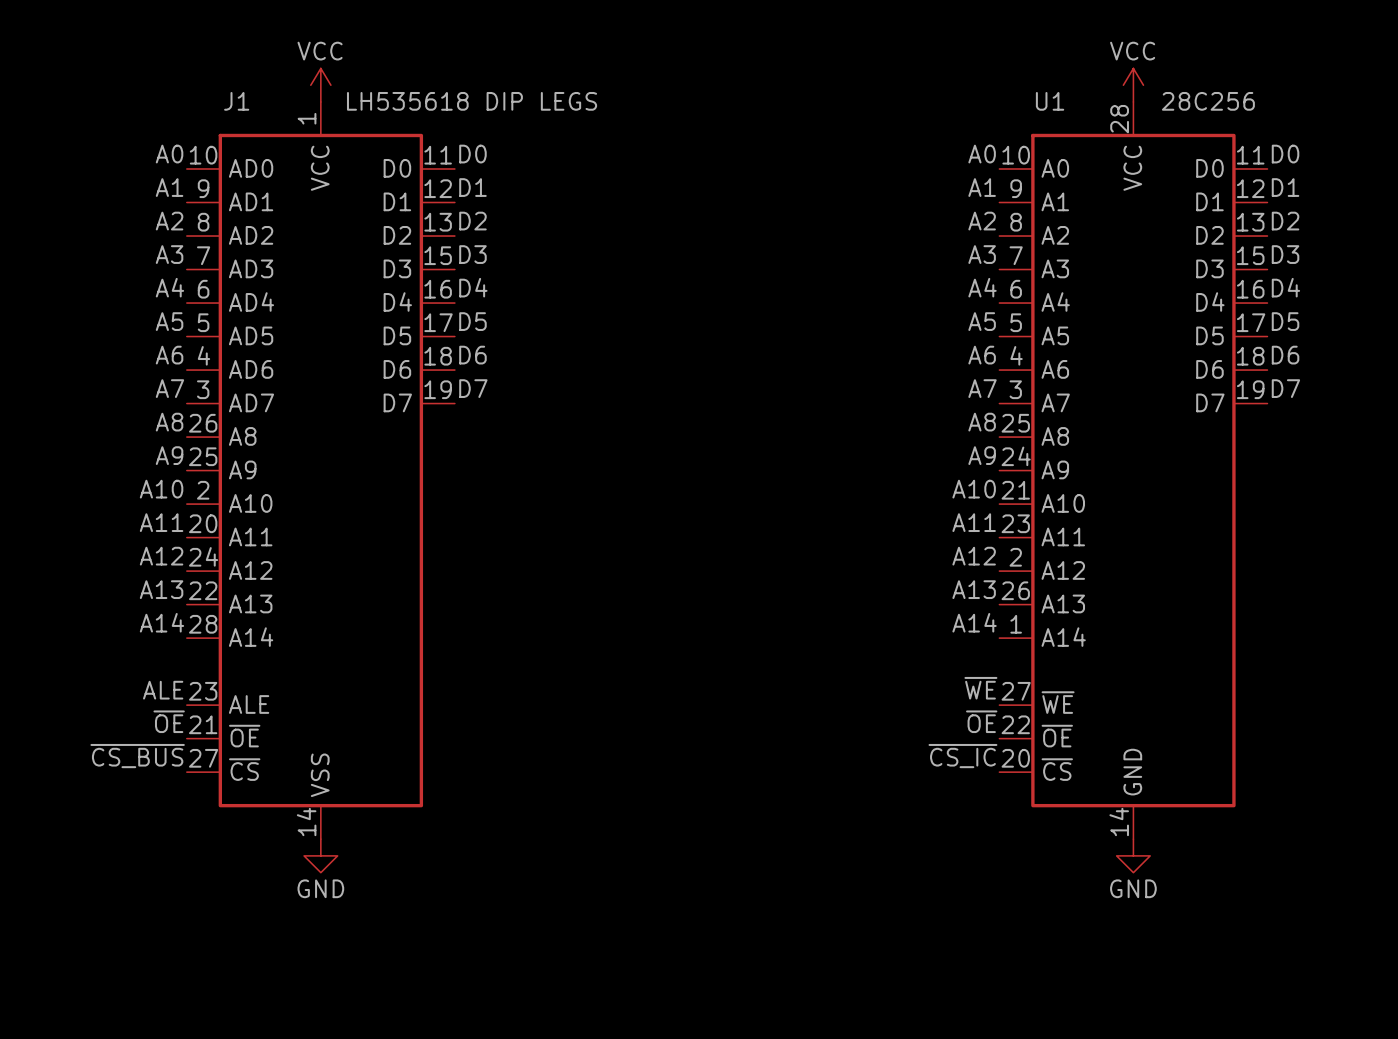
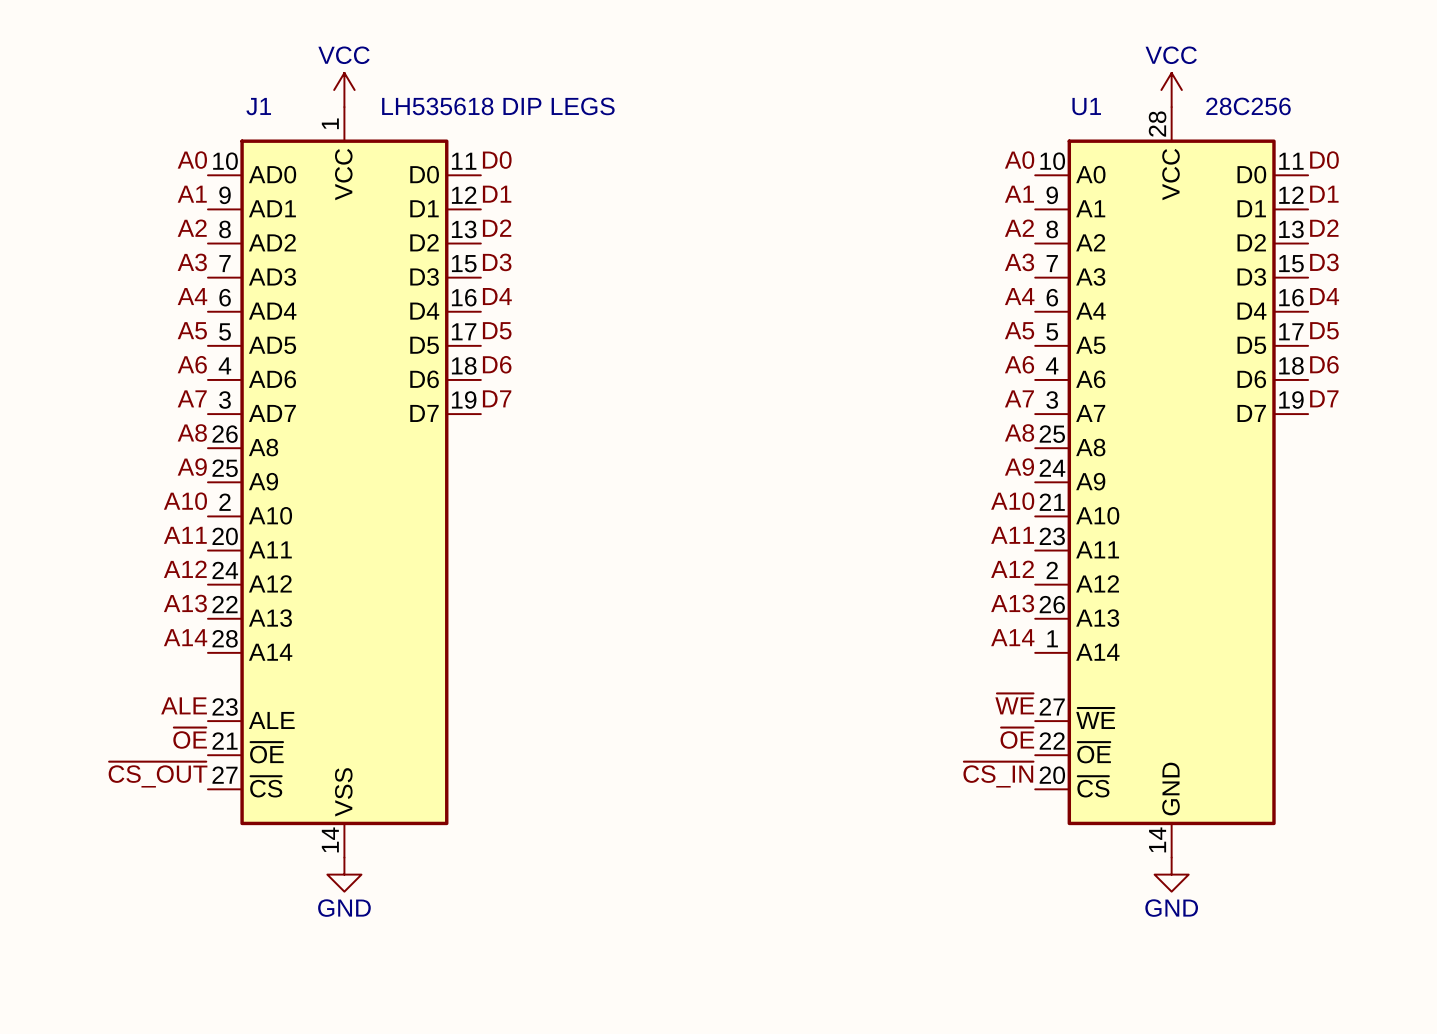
label: ~{CS_BUS} (137, 756) -> ~{CS_OUT} (158, 774)
label: ~{CS_IC} (962, 756) -> ~{CS_IN} (998, 774)

